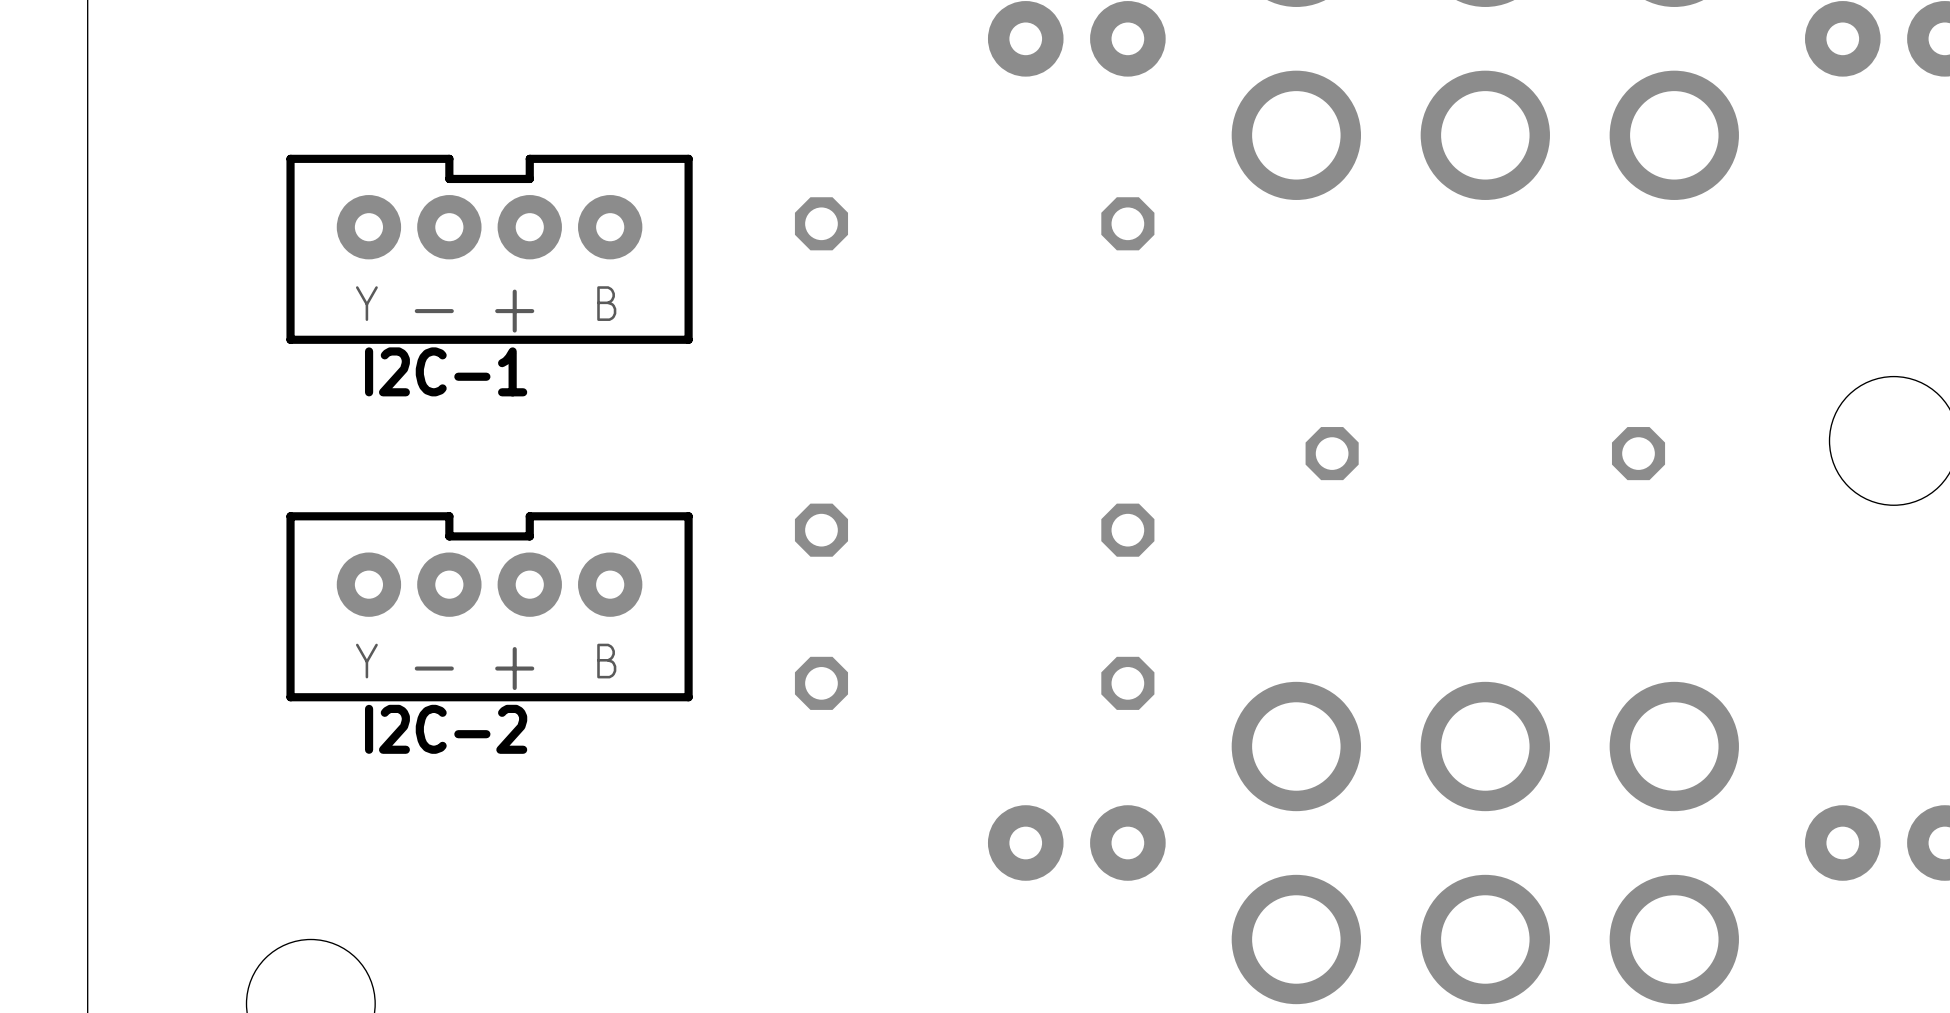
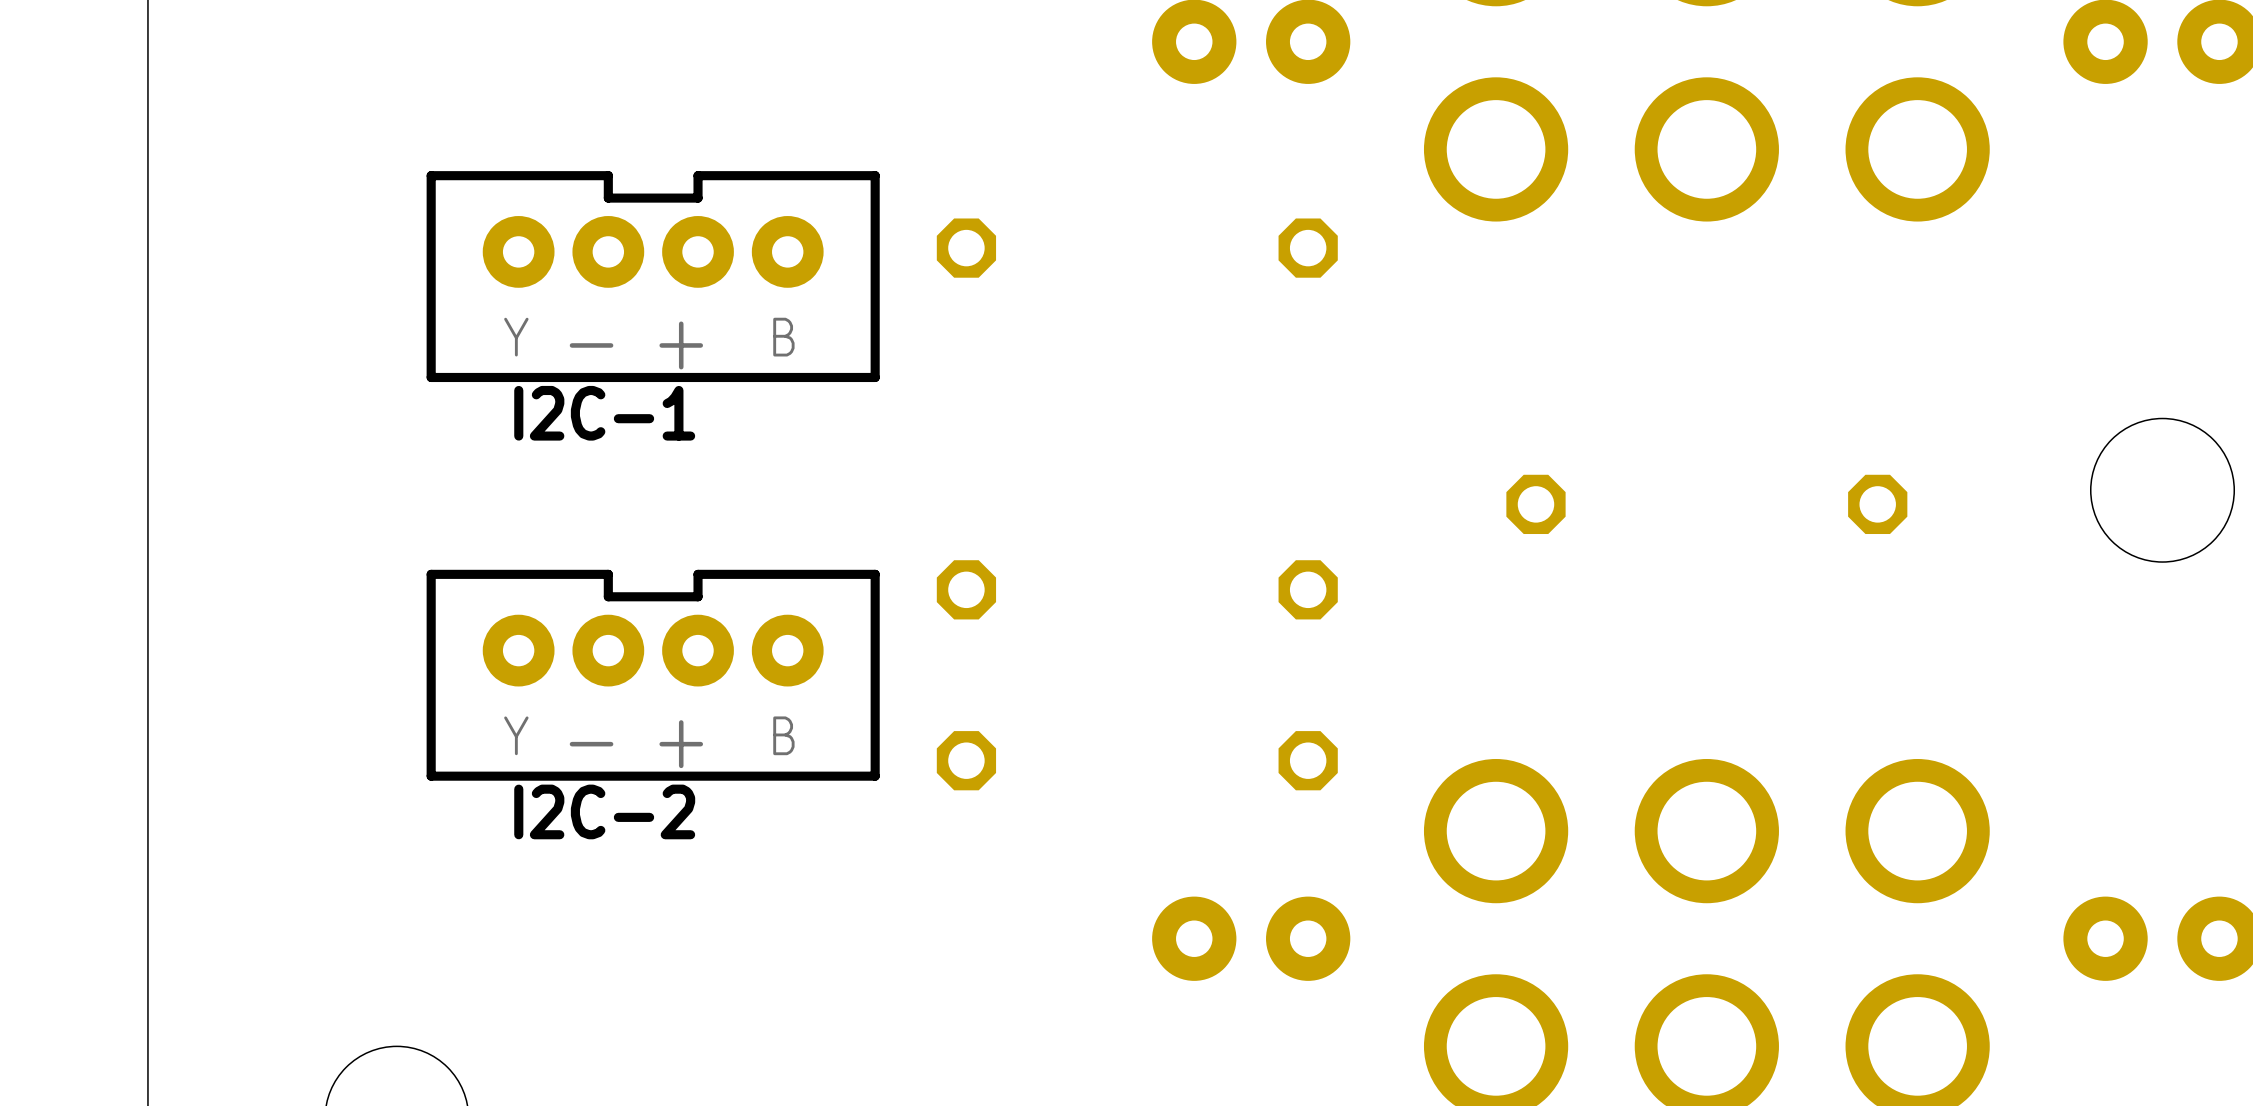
I2C-1 position: (489, 249) -> (653, 276)
I2C-2 position: (489, 606) -> (653, 675)

